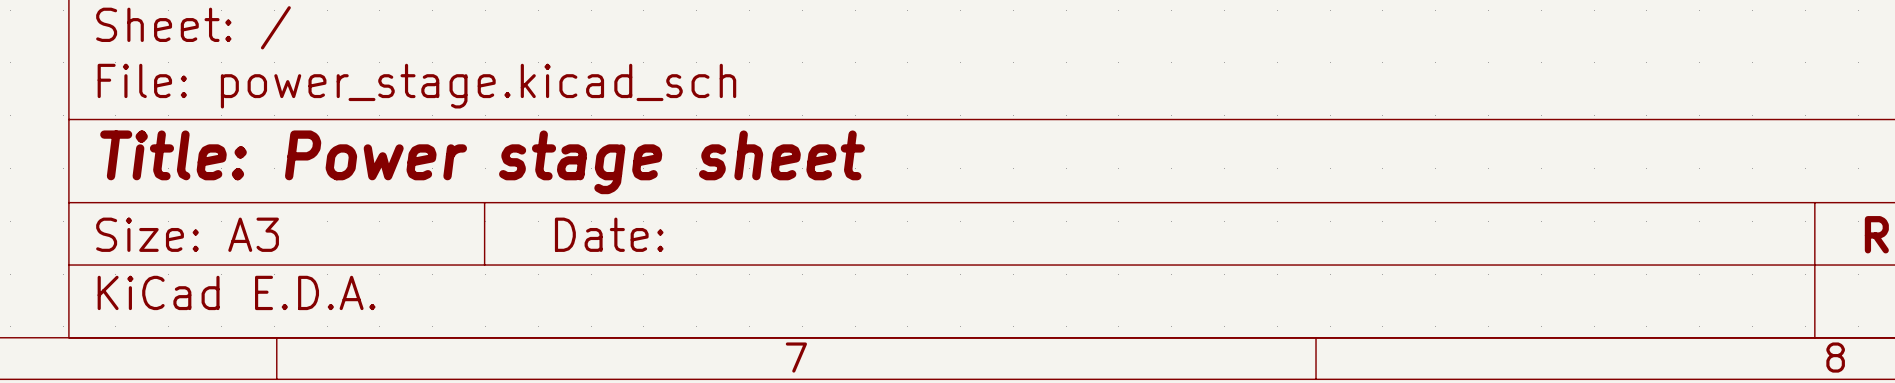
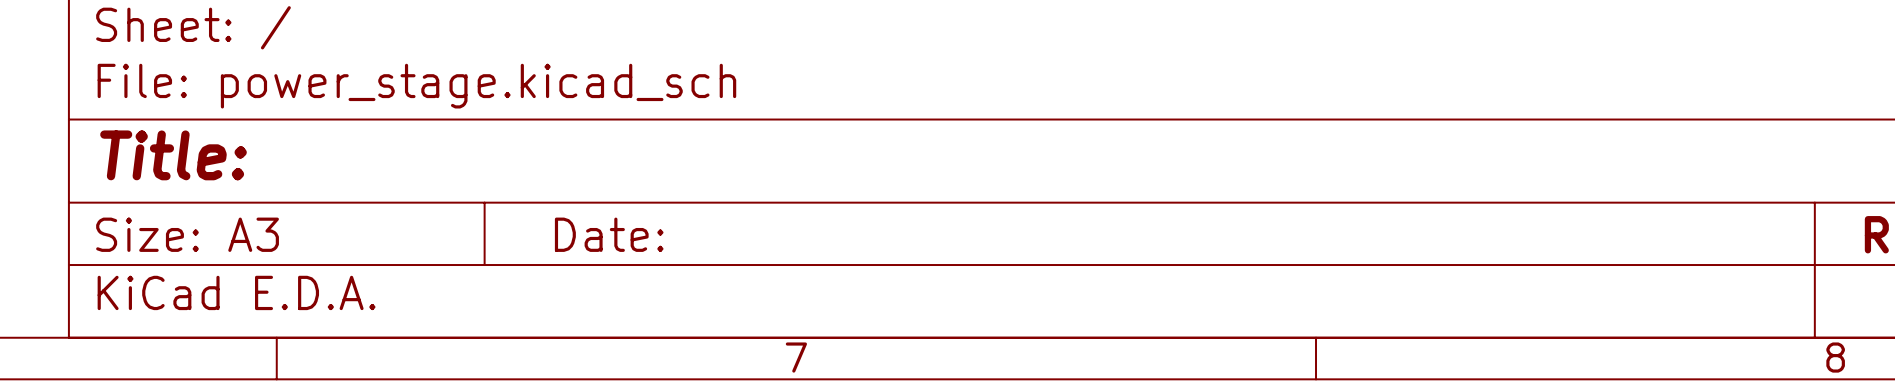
title block: Title: Power stage sheet (482, 162) -> Title: (173, 155)

